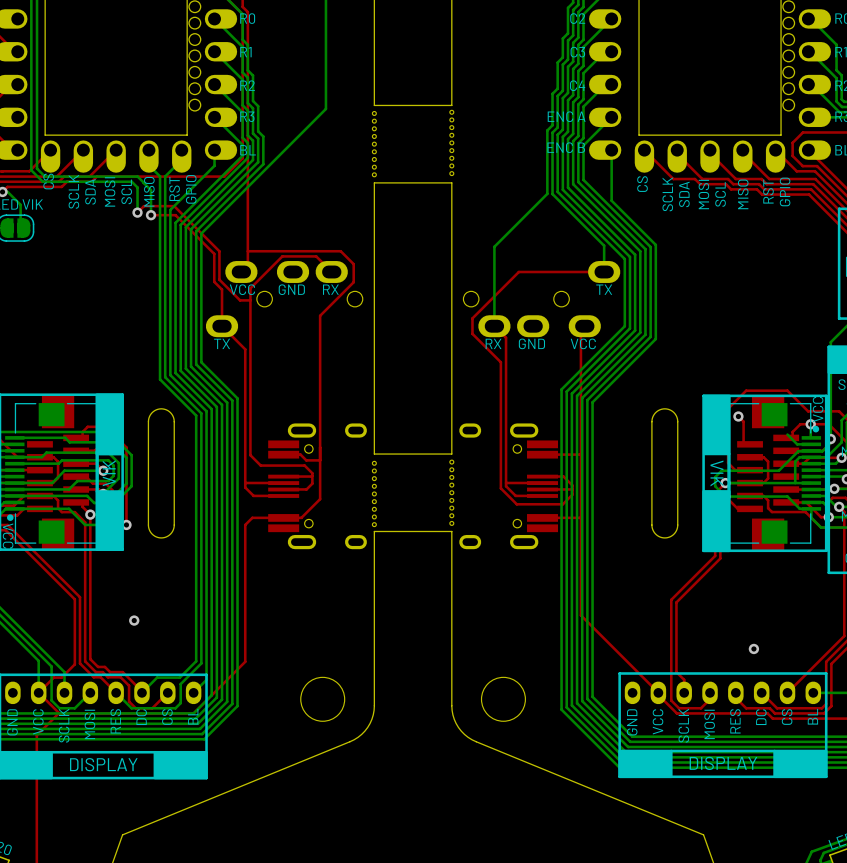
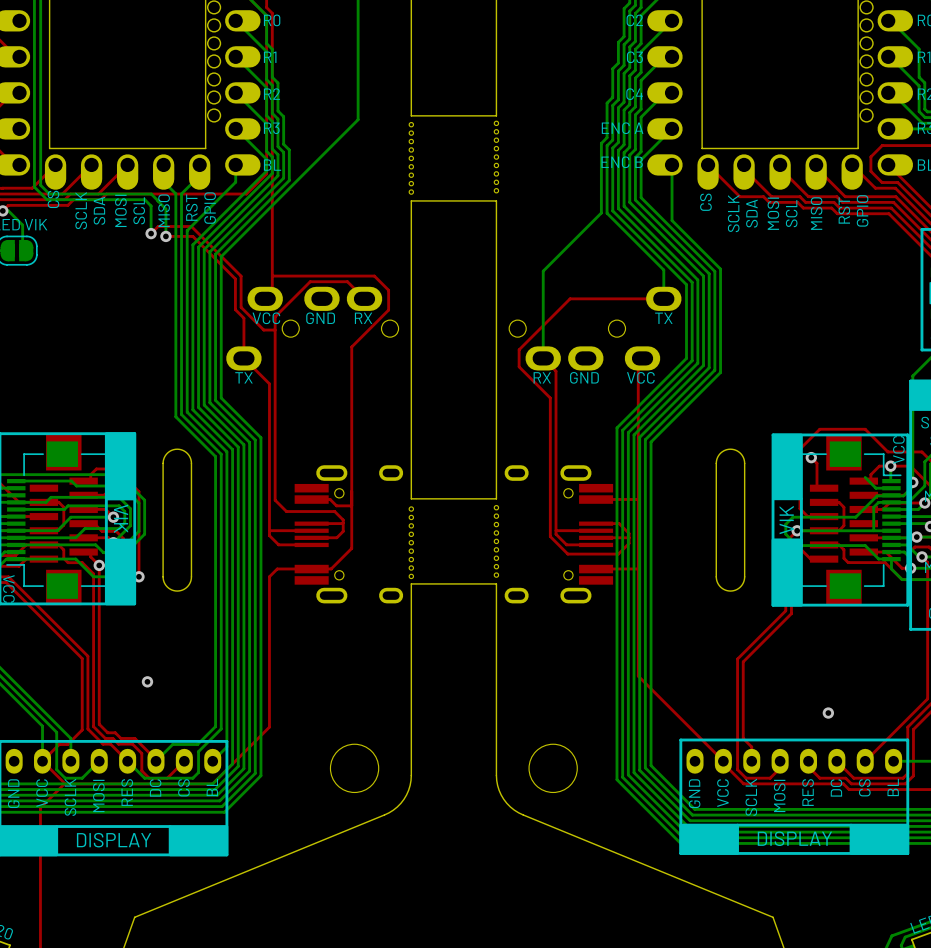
part footprint: [5, 403, 99, 544] -> [6, 441, 108, 599]
part footprint: [727, 403, 822, 544] -> [800, 441, 902, 599]
text: none -> VIK (121, 518)
text: none -> VIK (786, 520)

